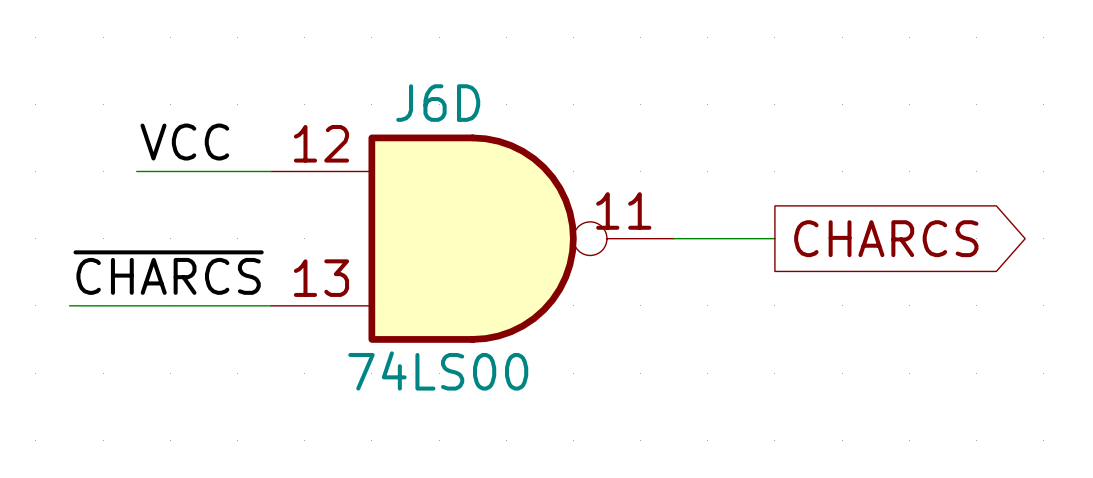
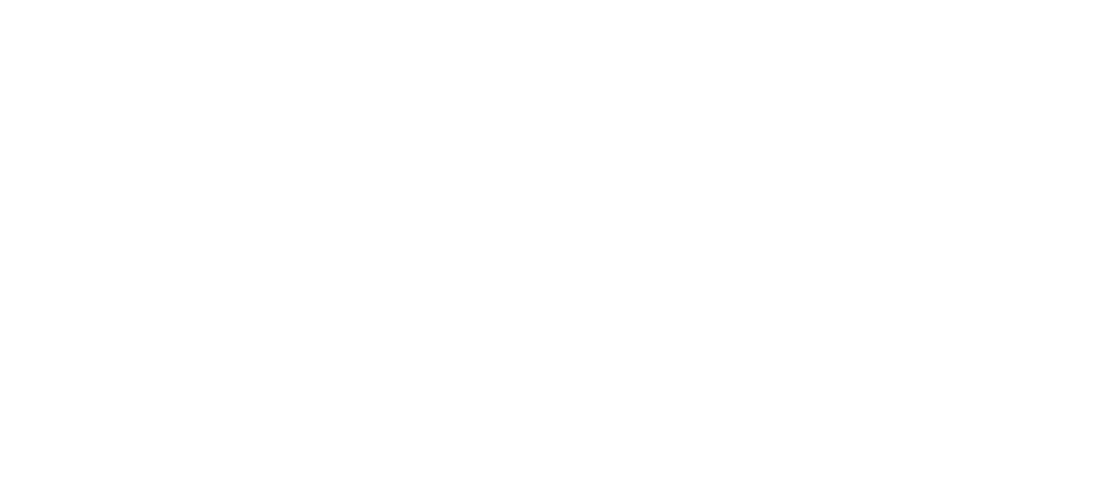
label: VCC (184, 142) -> none
wire: (136, 171) (271, 171) -> none
J6D: 74LS00 (472, 238) -> none
wire: (674, 238) (774, 238) -> none
global label: CHARCS (886, 238) -> none
label: ~{CHARCS} (168, 272) -> none
wire: (69, 305) (271, 305) -> none

